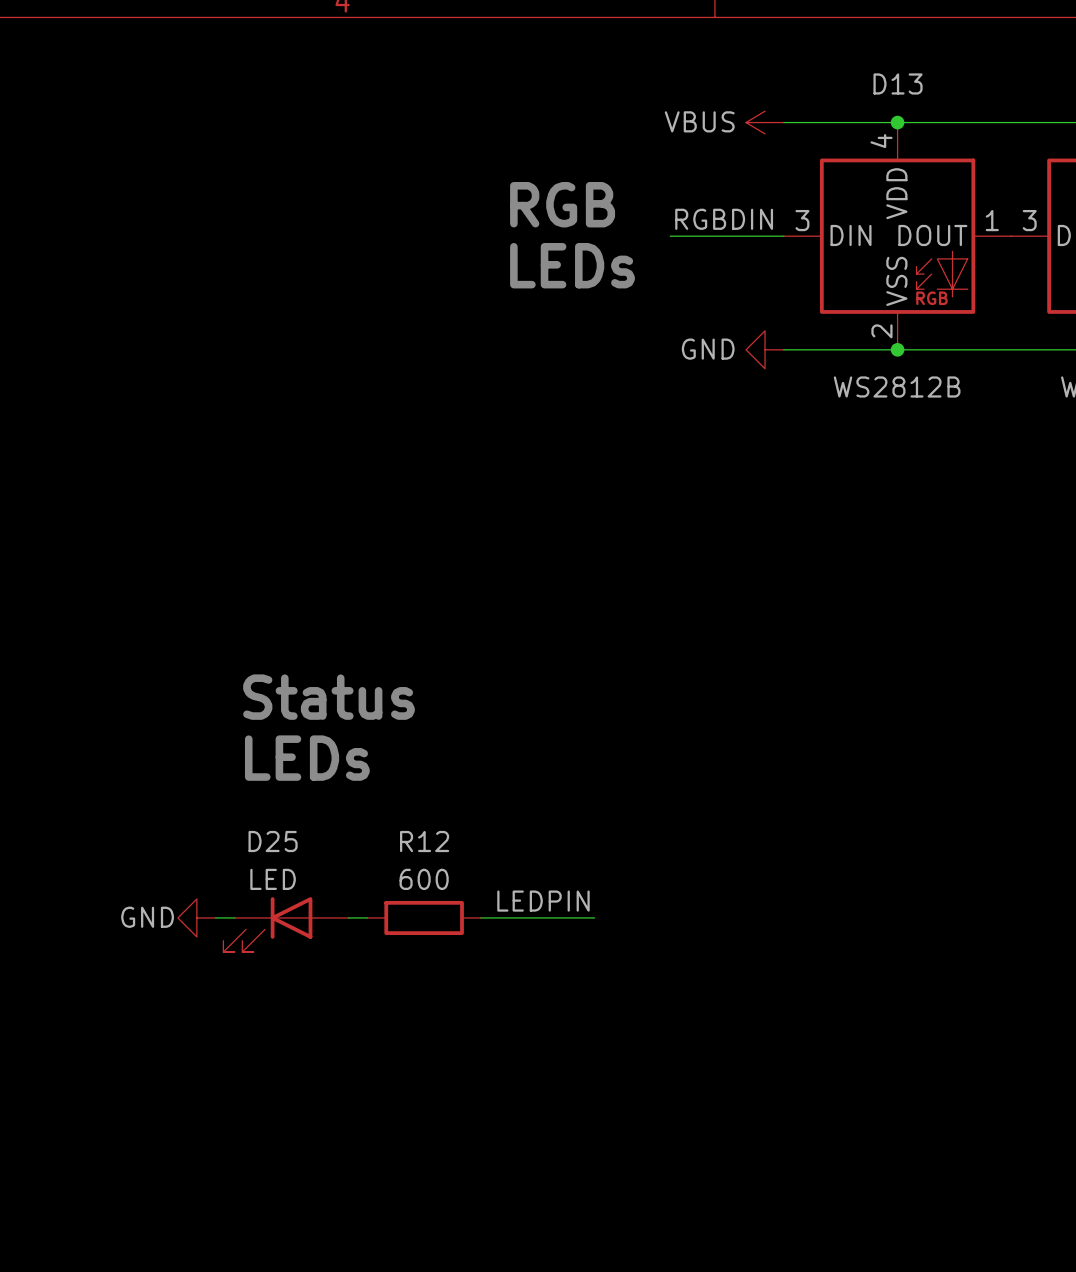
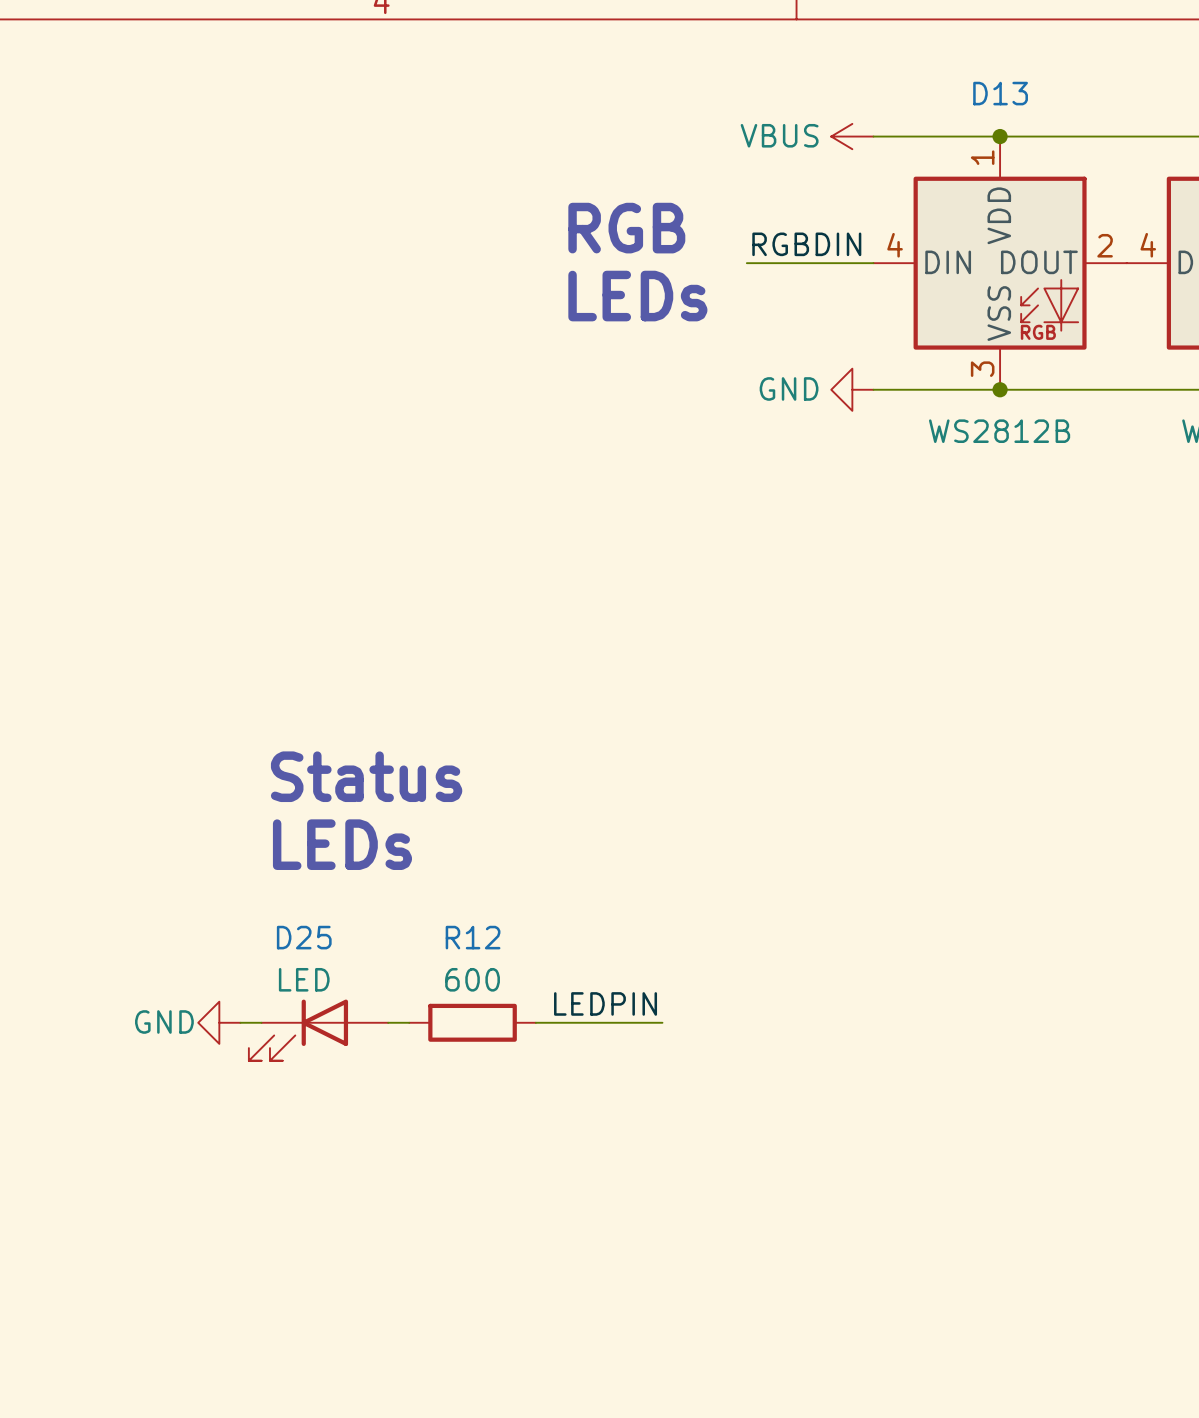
D13 pin number: 4 (881, 141) -> 1 (982, 157)
D13 pin number: 3 (802, 220) -> 4 (895, 245)
D13 pin number: 1 (992, 220) -> 2 (1105, 245)
part pin number: 3 (1029, 220) -> 4 (1148, 245)
D13 pin number: 2 (881, 331) -> 3 (982, 369)

